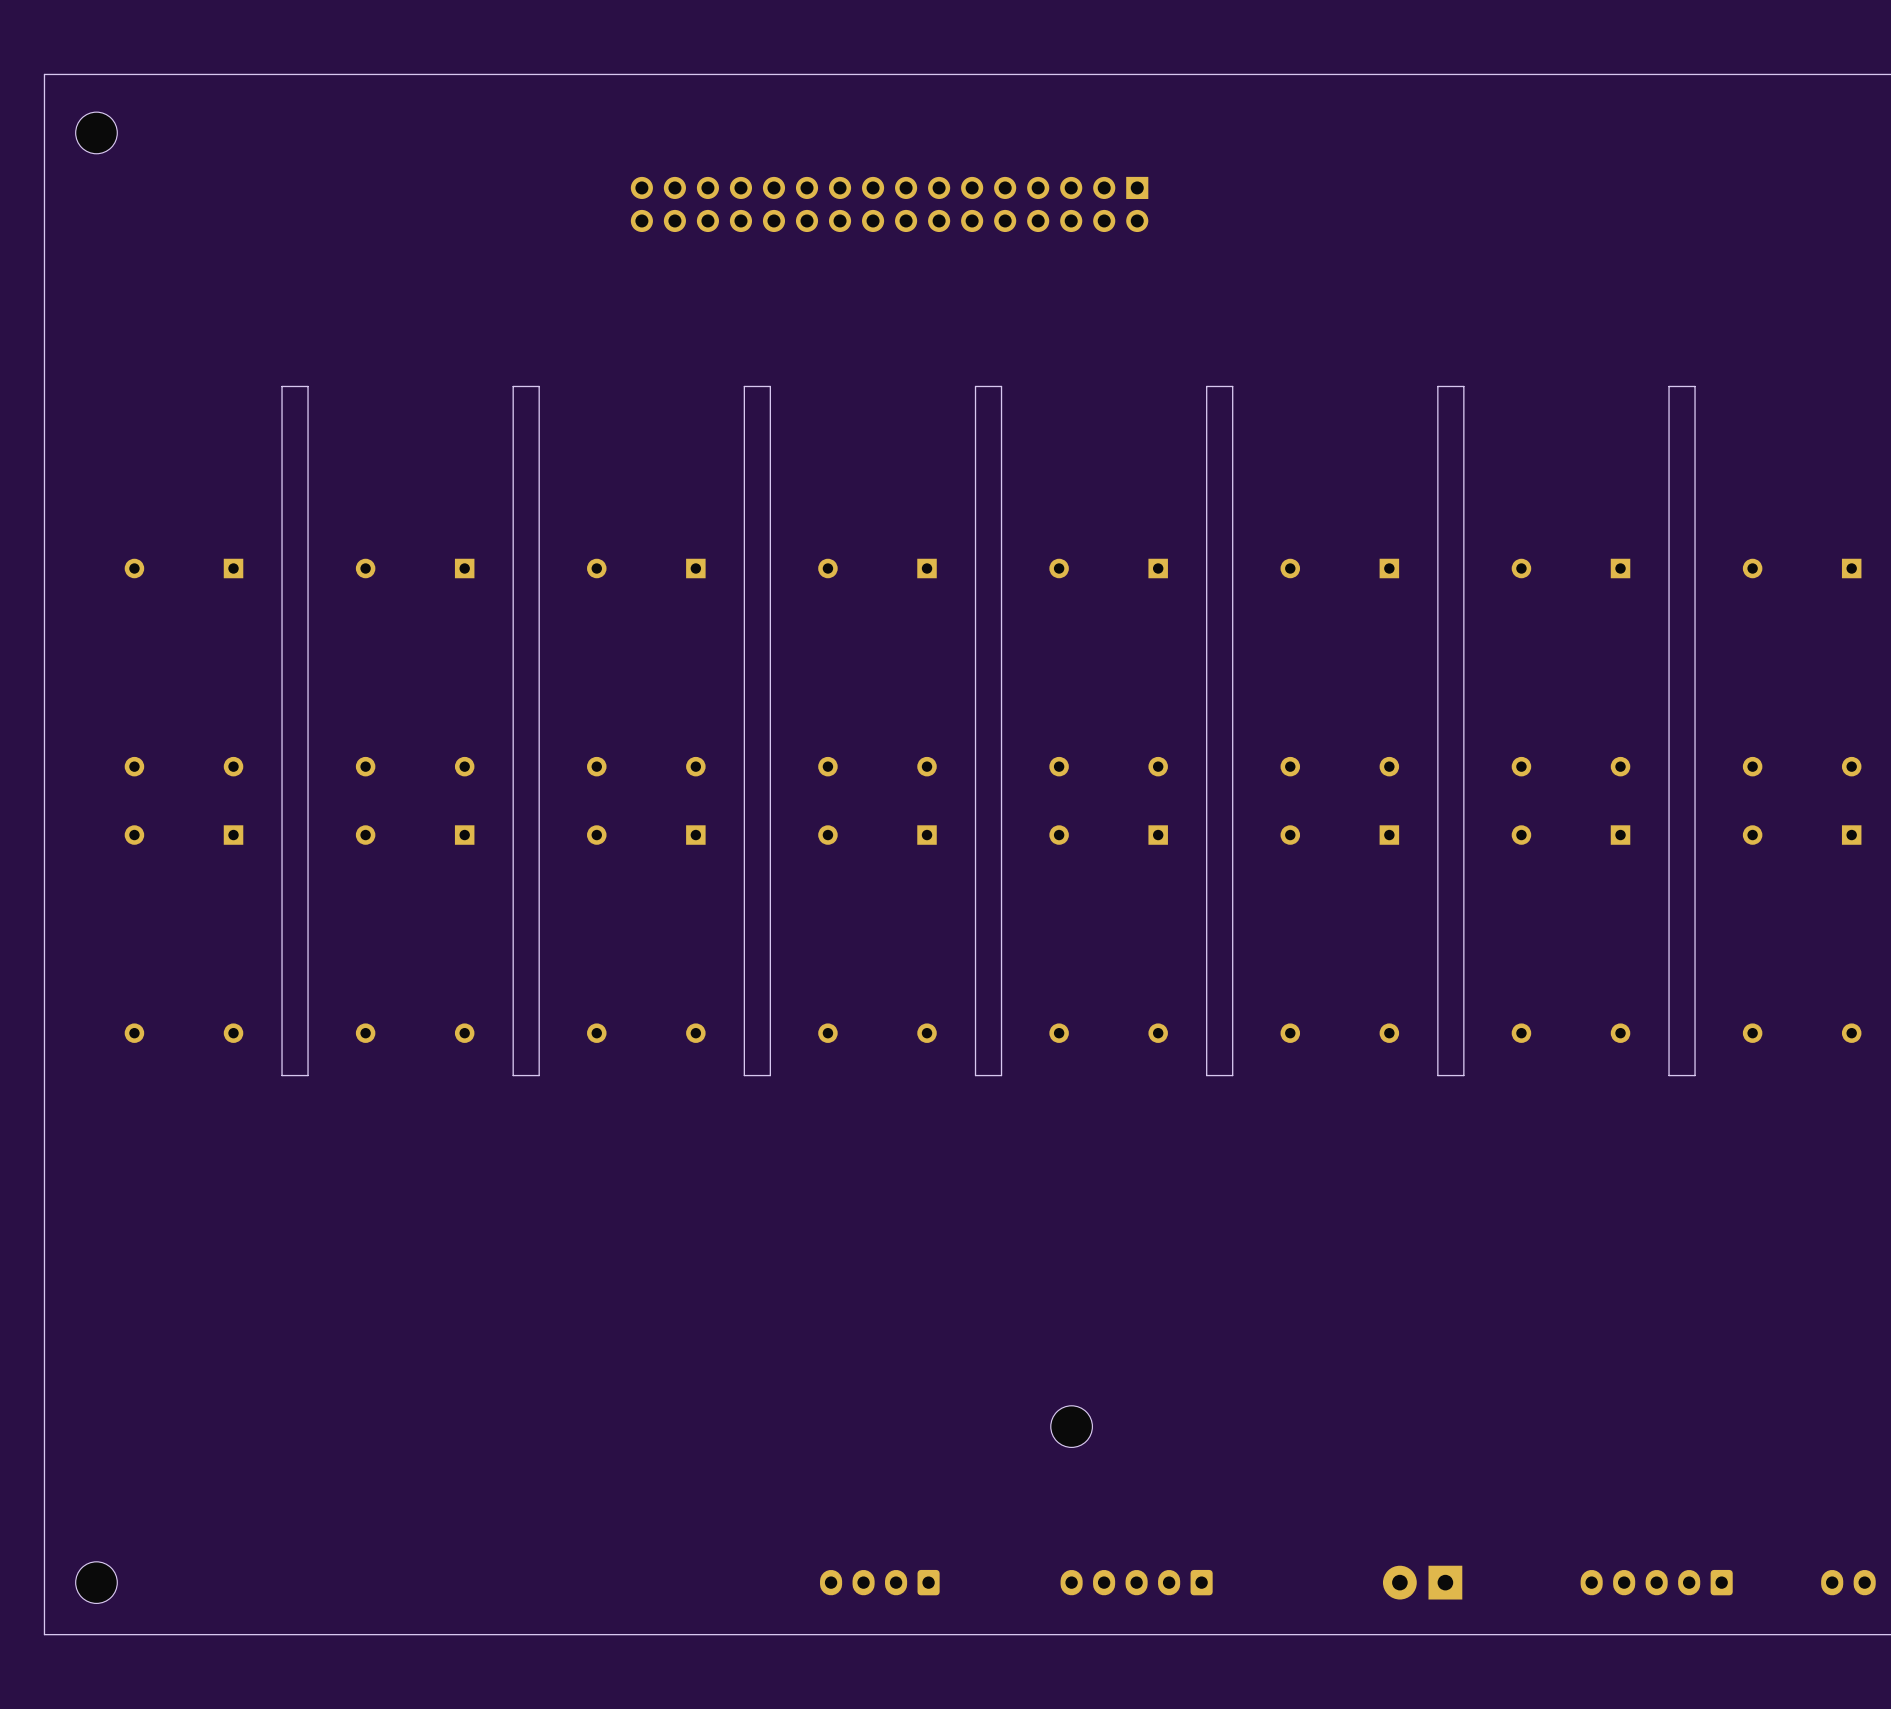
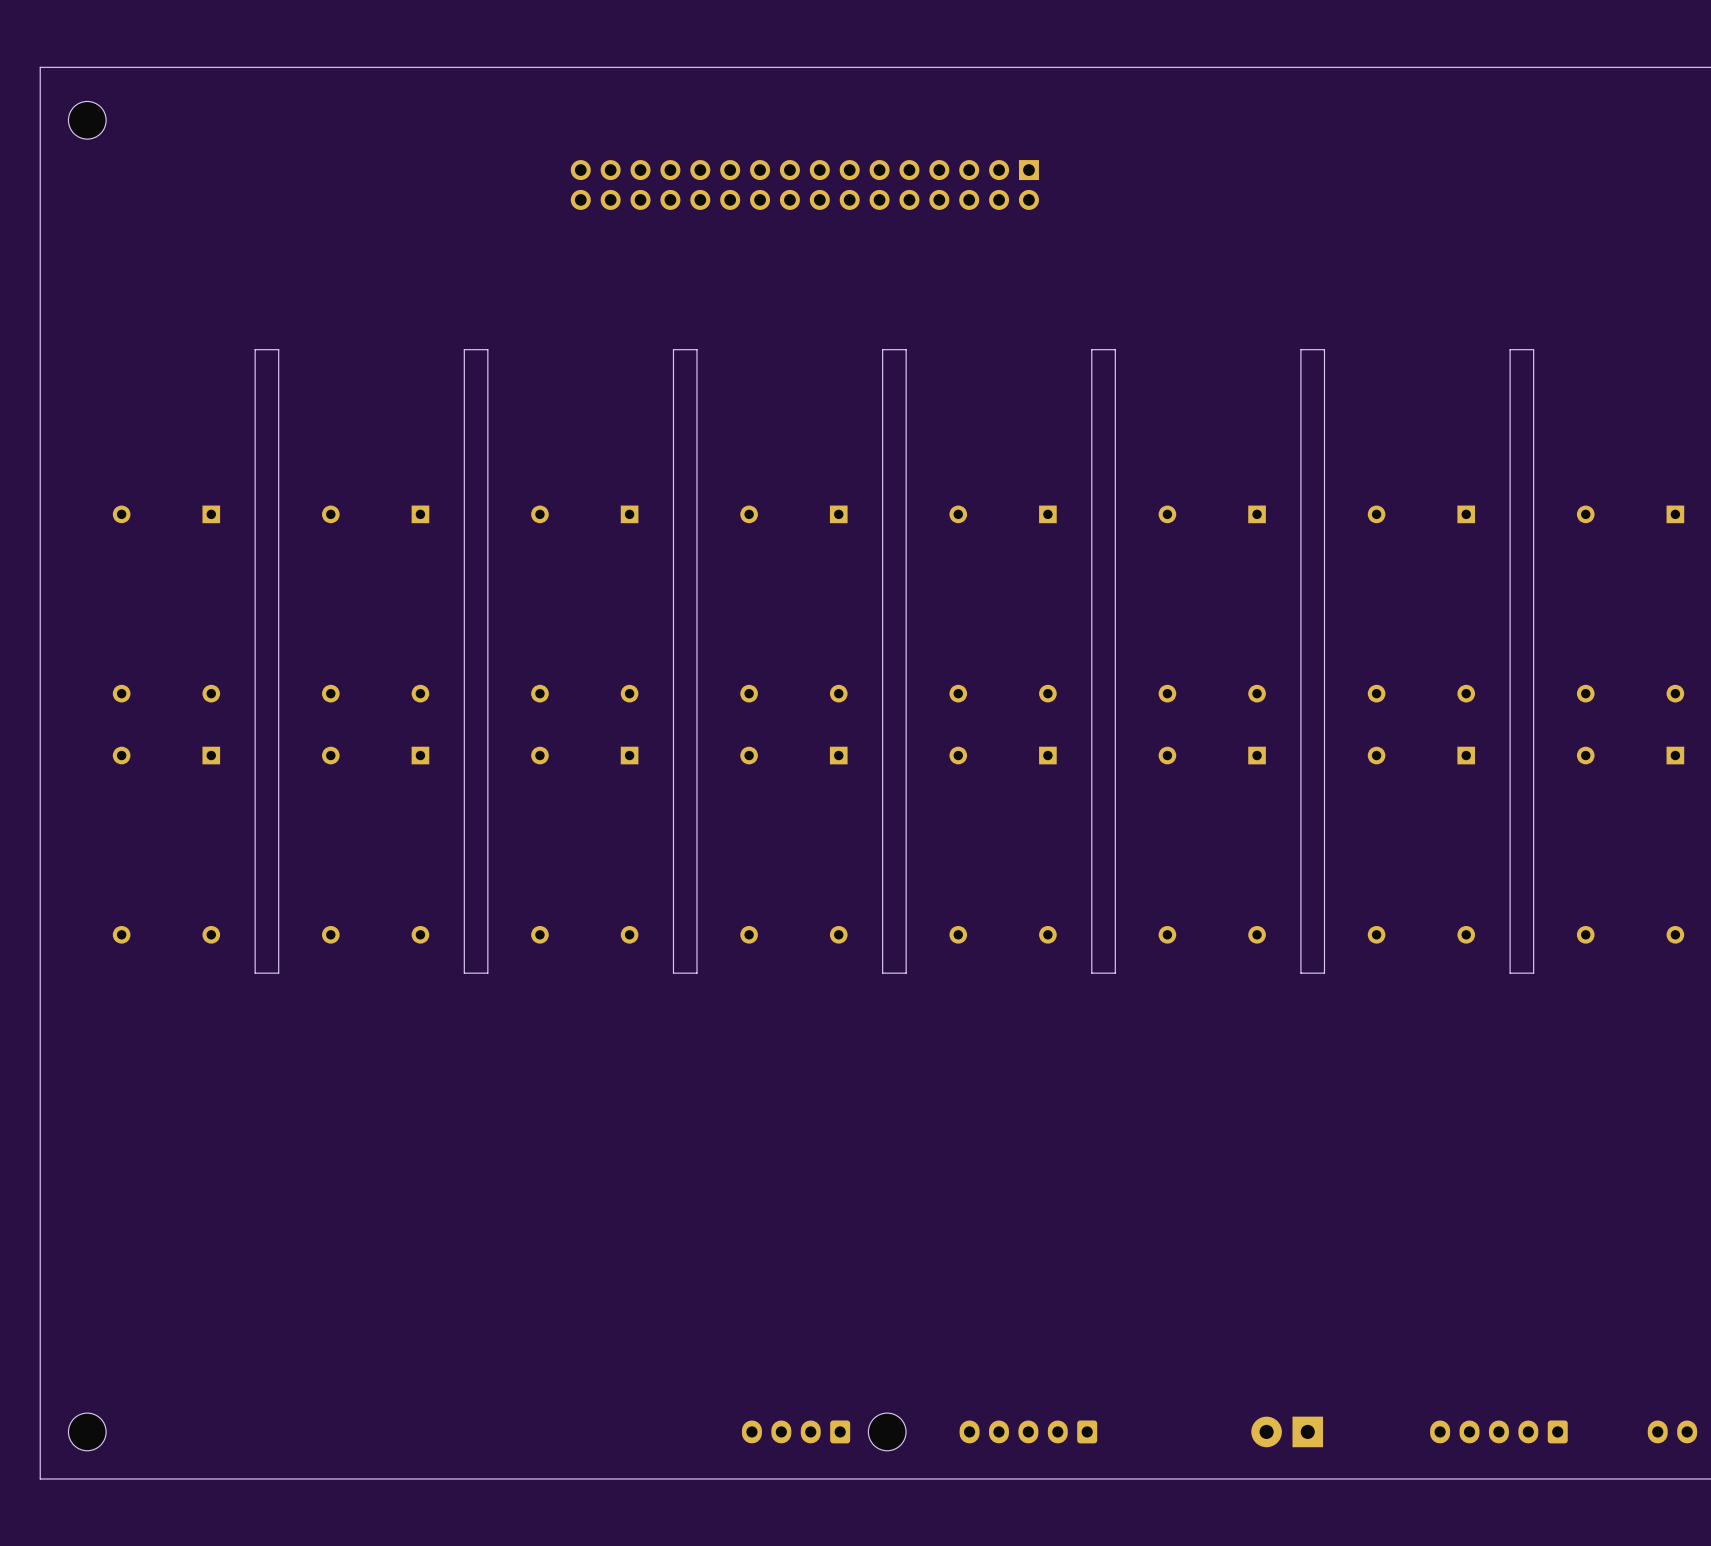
part position: (1071, 1426) -> (887, 1431)

